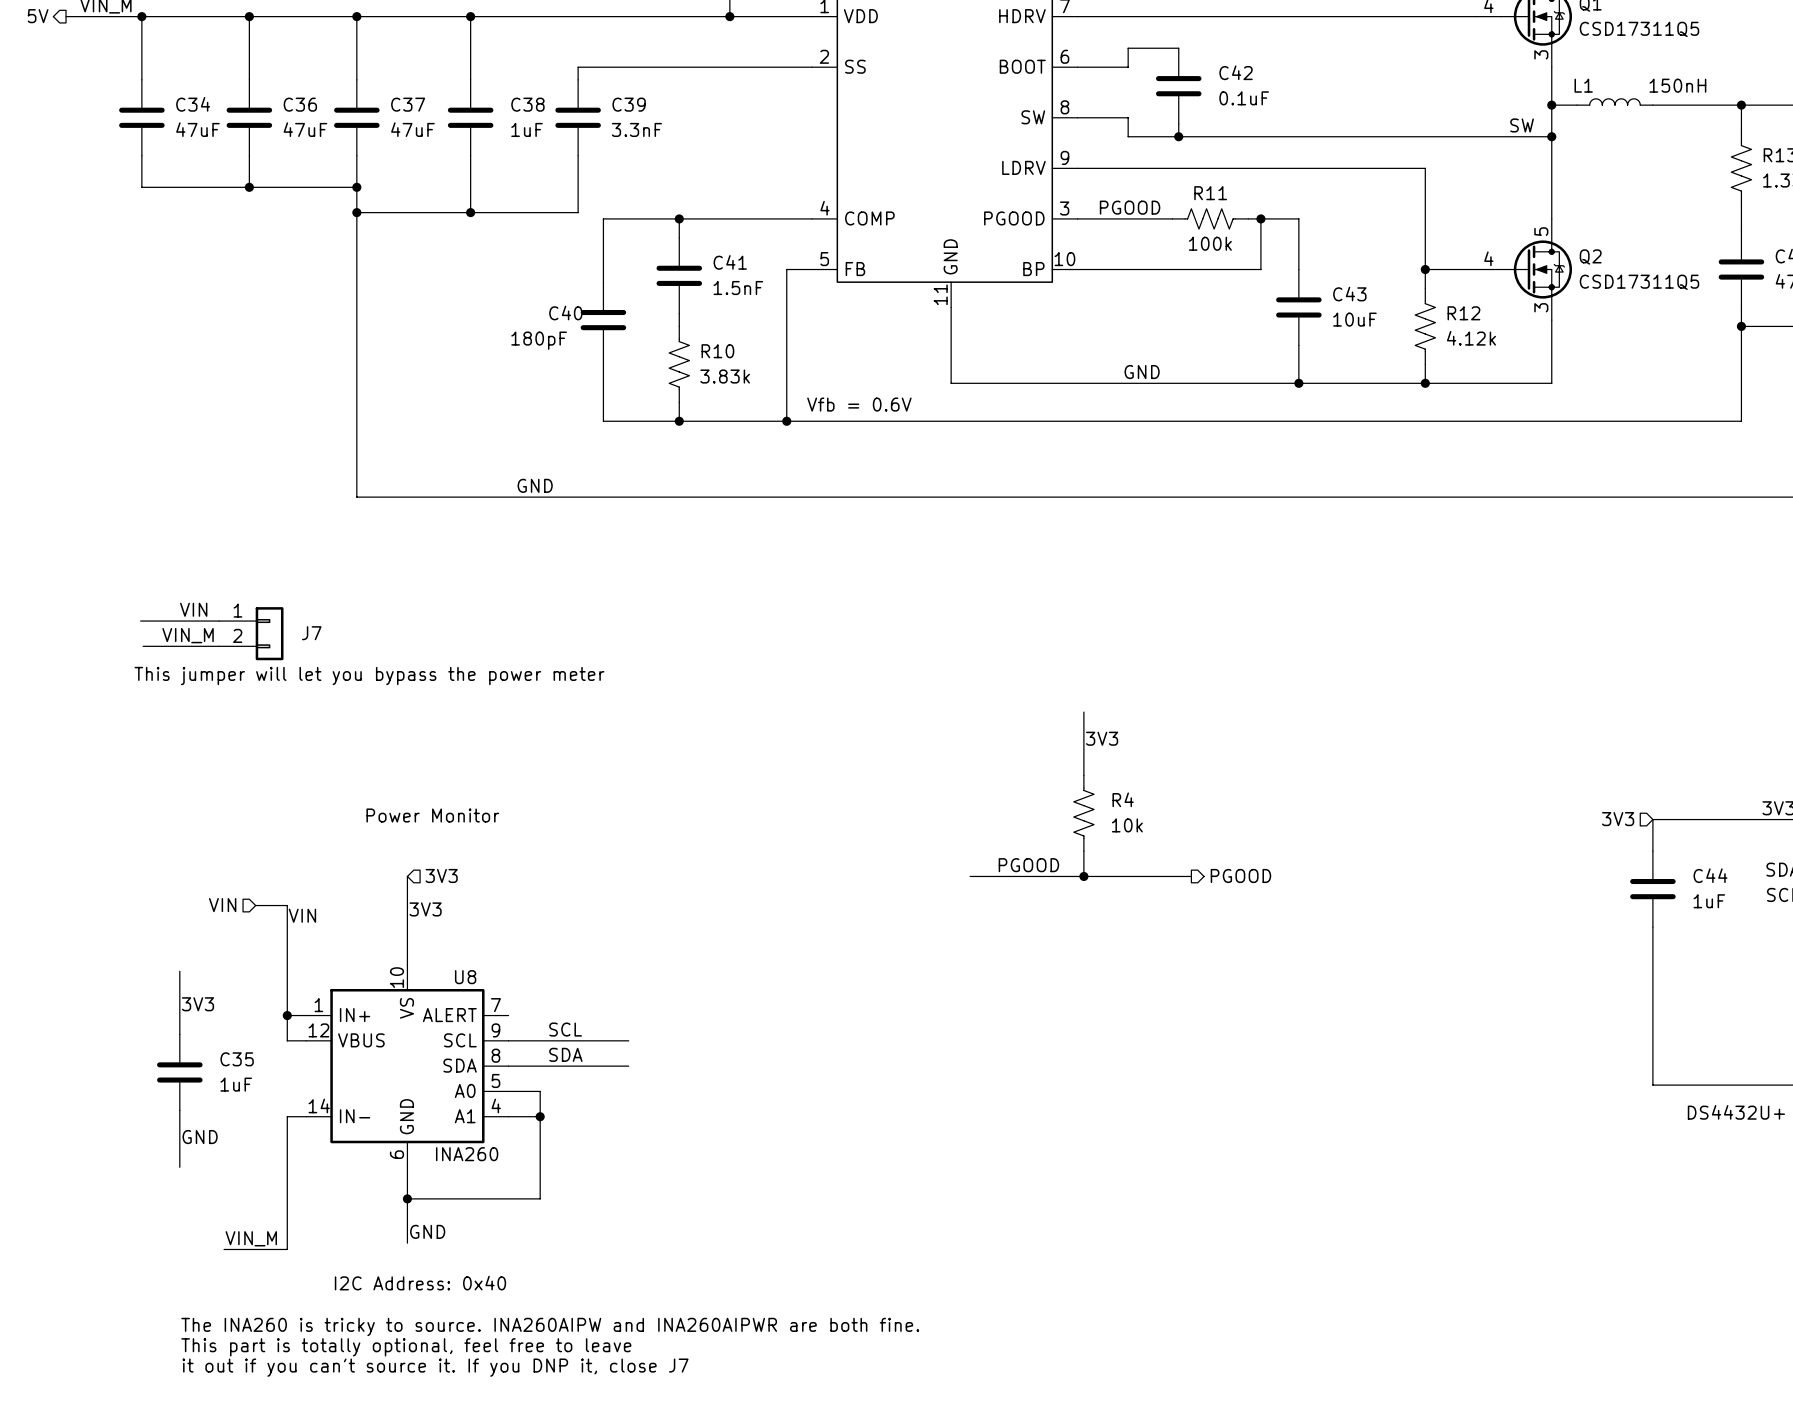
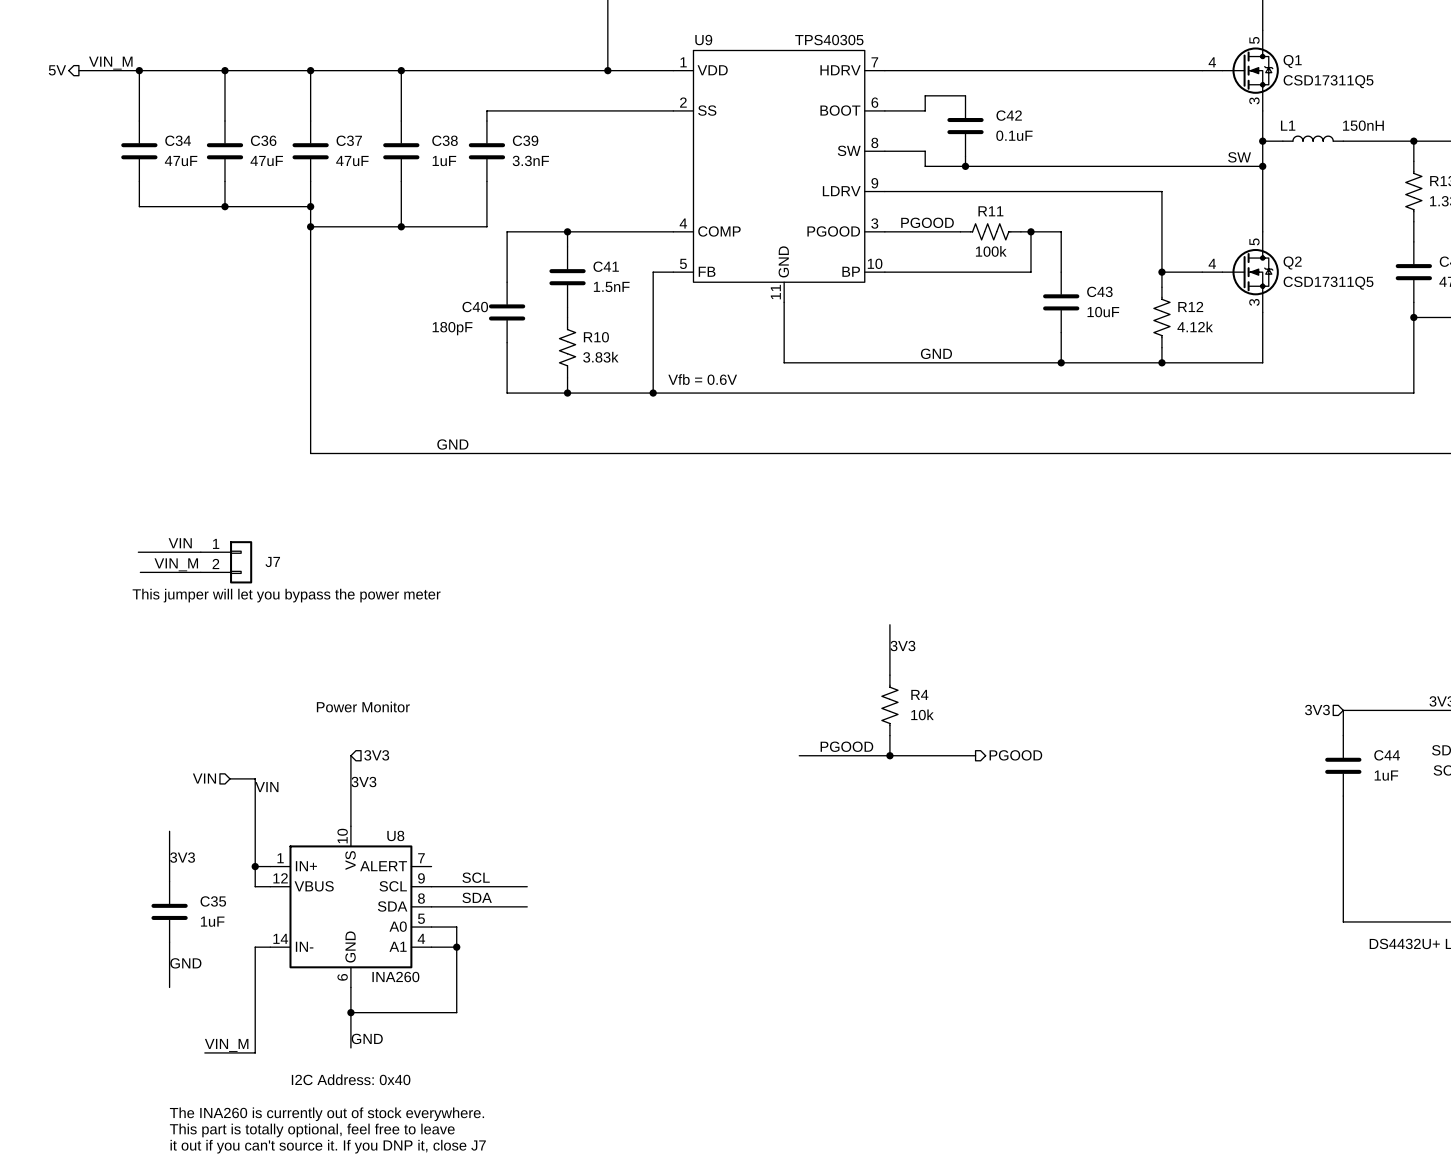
text: The INA260 is tricky to source. INA260AIPW and INA260AIPWR are both fine. (550, 1326) -> The INA260 is currently out of stock everywhere. (326, 1114)

